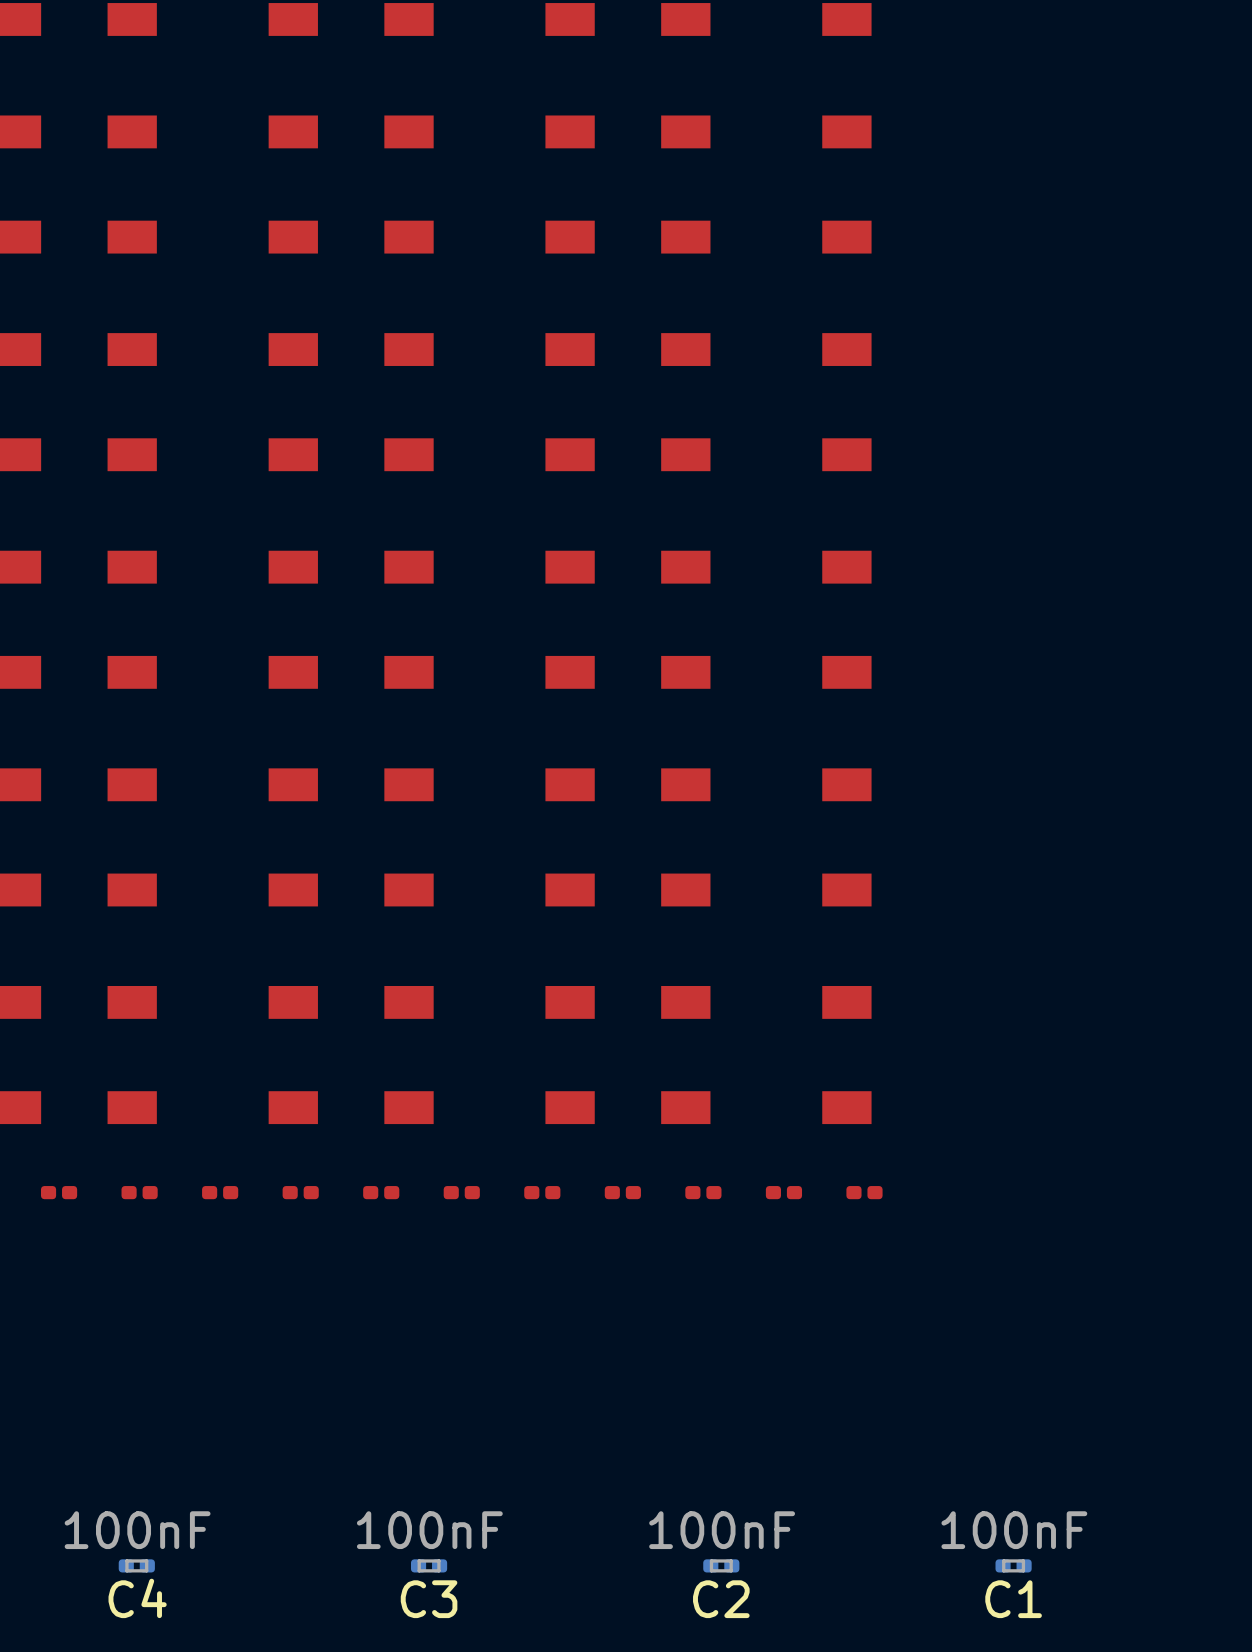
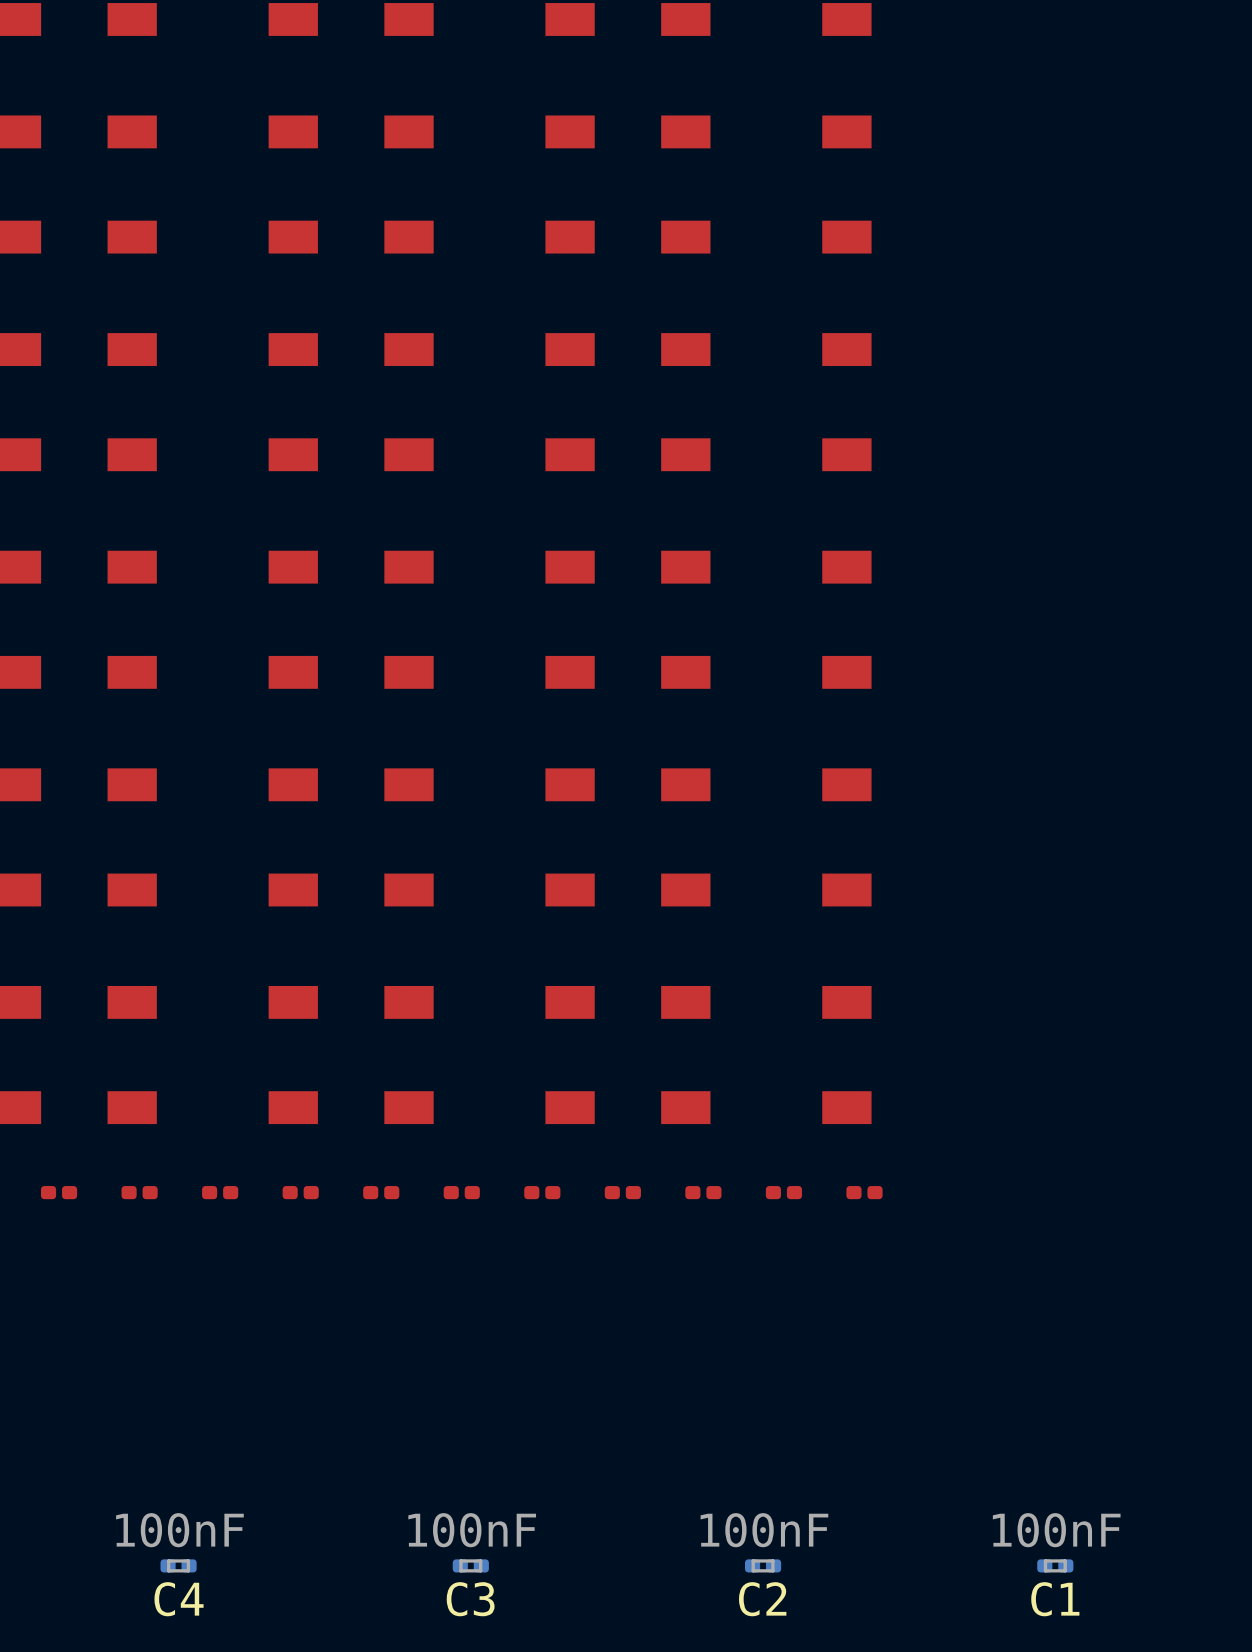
C4 position: (136, 1565) -> (178, 1565)
C3 position: (429, 1565) -> (470, 1565)
C2 position: (721, 1565) -> (763, 1565)
C1 position: (1013, 1565) -> (1055, 1565)

